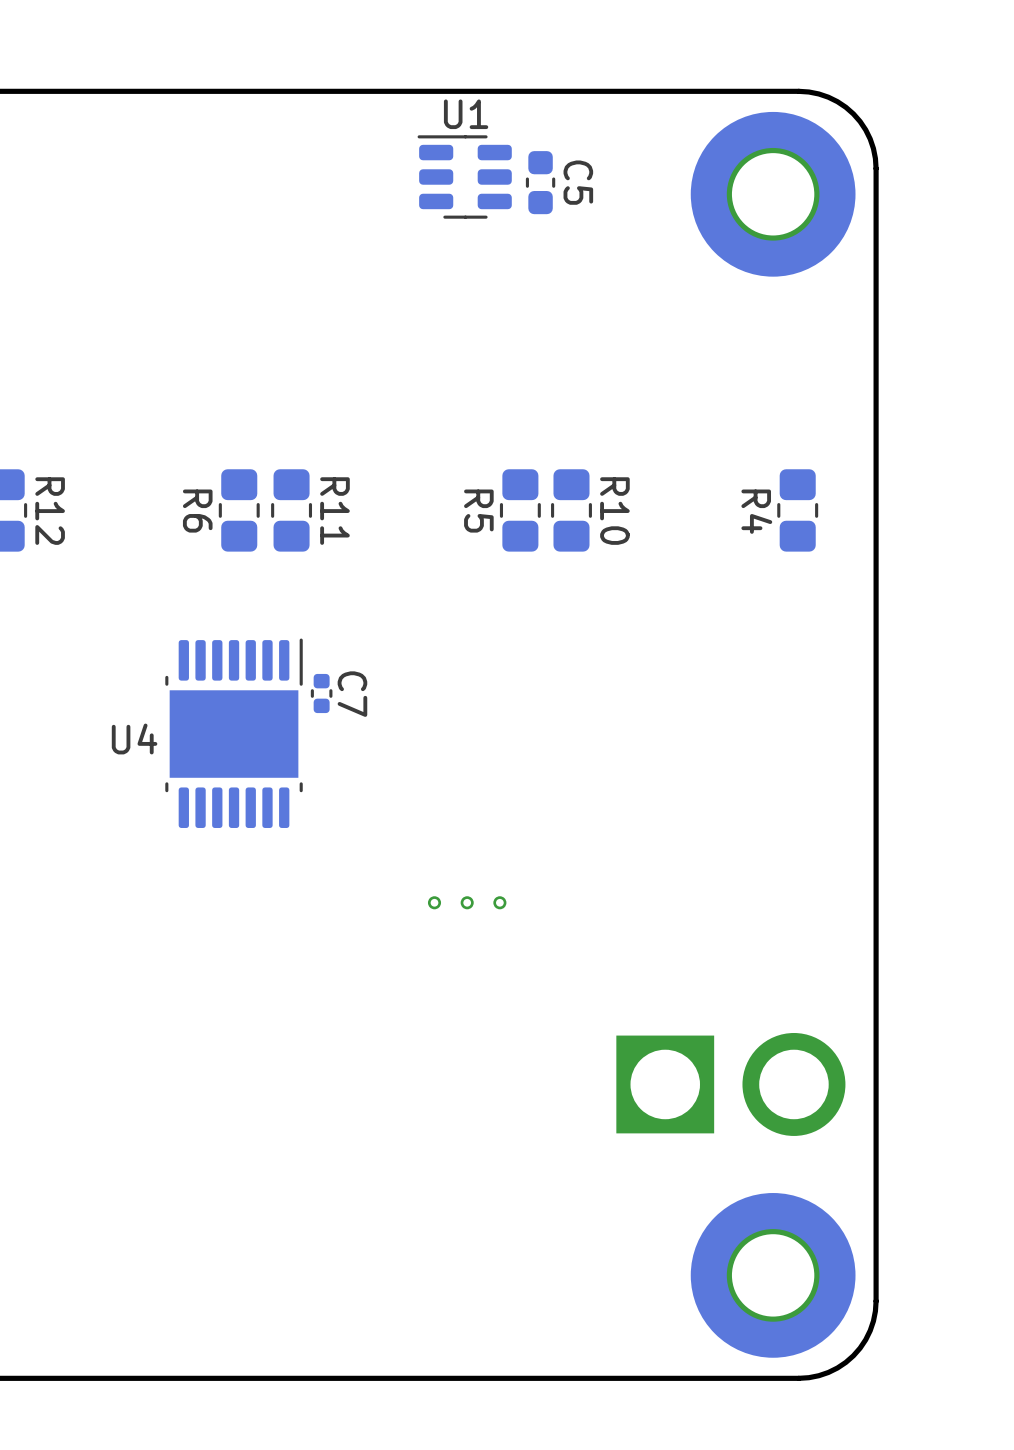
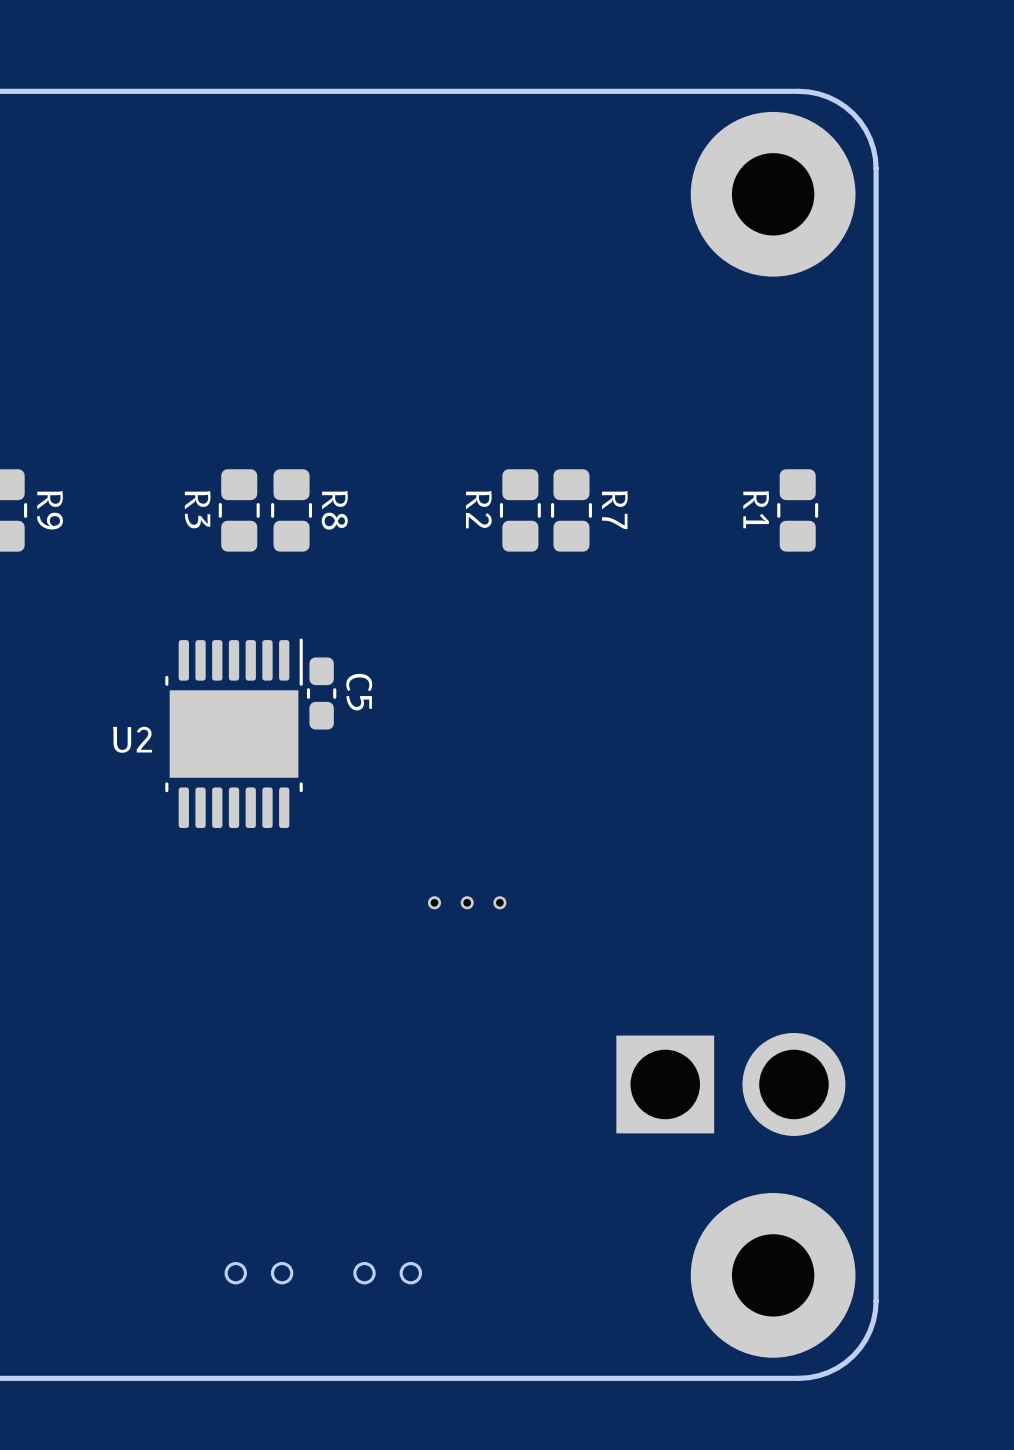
C5 footprint: [525, 151, 556, 215] -> [306, 657, 337, 730]
U1: (464, 177) -> none
R12 name: R12 (50, 511) -> R9 (49, 510)
R6 name: R6 (197, 511) -> R3 (197, 509)
R11 name: R11 (334, 511) -> R8 (334, 510)
R5 name: R5 (478, 511) -> R2 (478, 509)
R10 name: R10 (614, 511) -> R7 (614, 510)
R4 name: R4 (756, 511) -> R1 (756, 509)
C7: (321, 693) -> none
U4 name: U4 (134, 739) -> U2 (132, 739)
part: none -> (258, 1273)
part: none -> (387, 1273)

